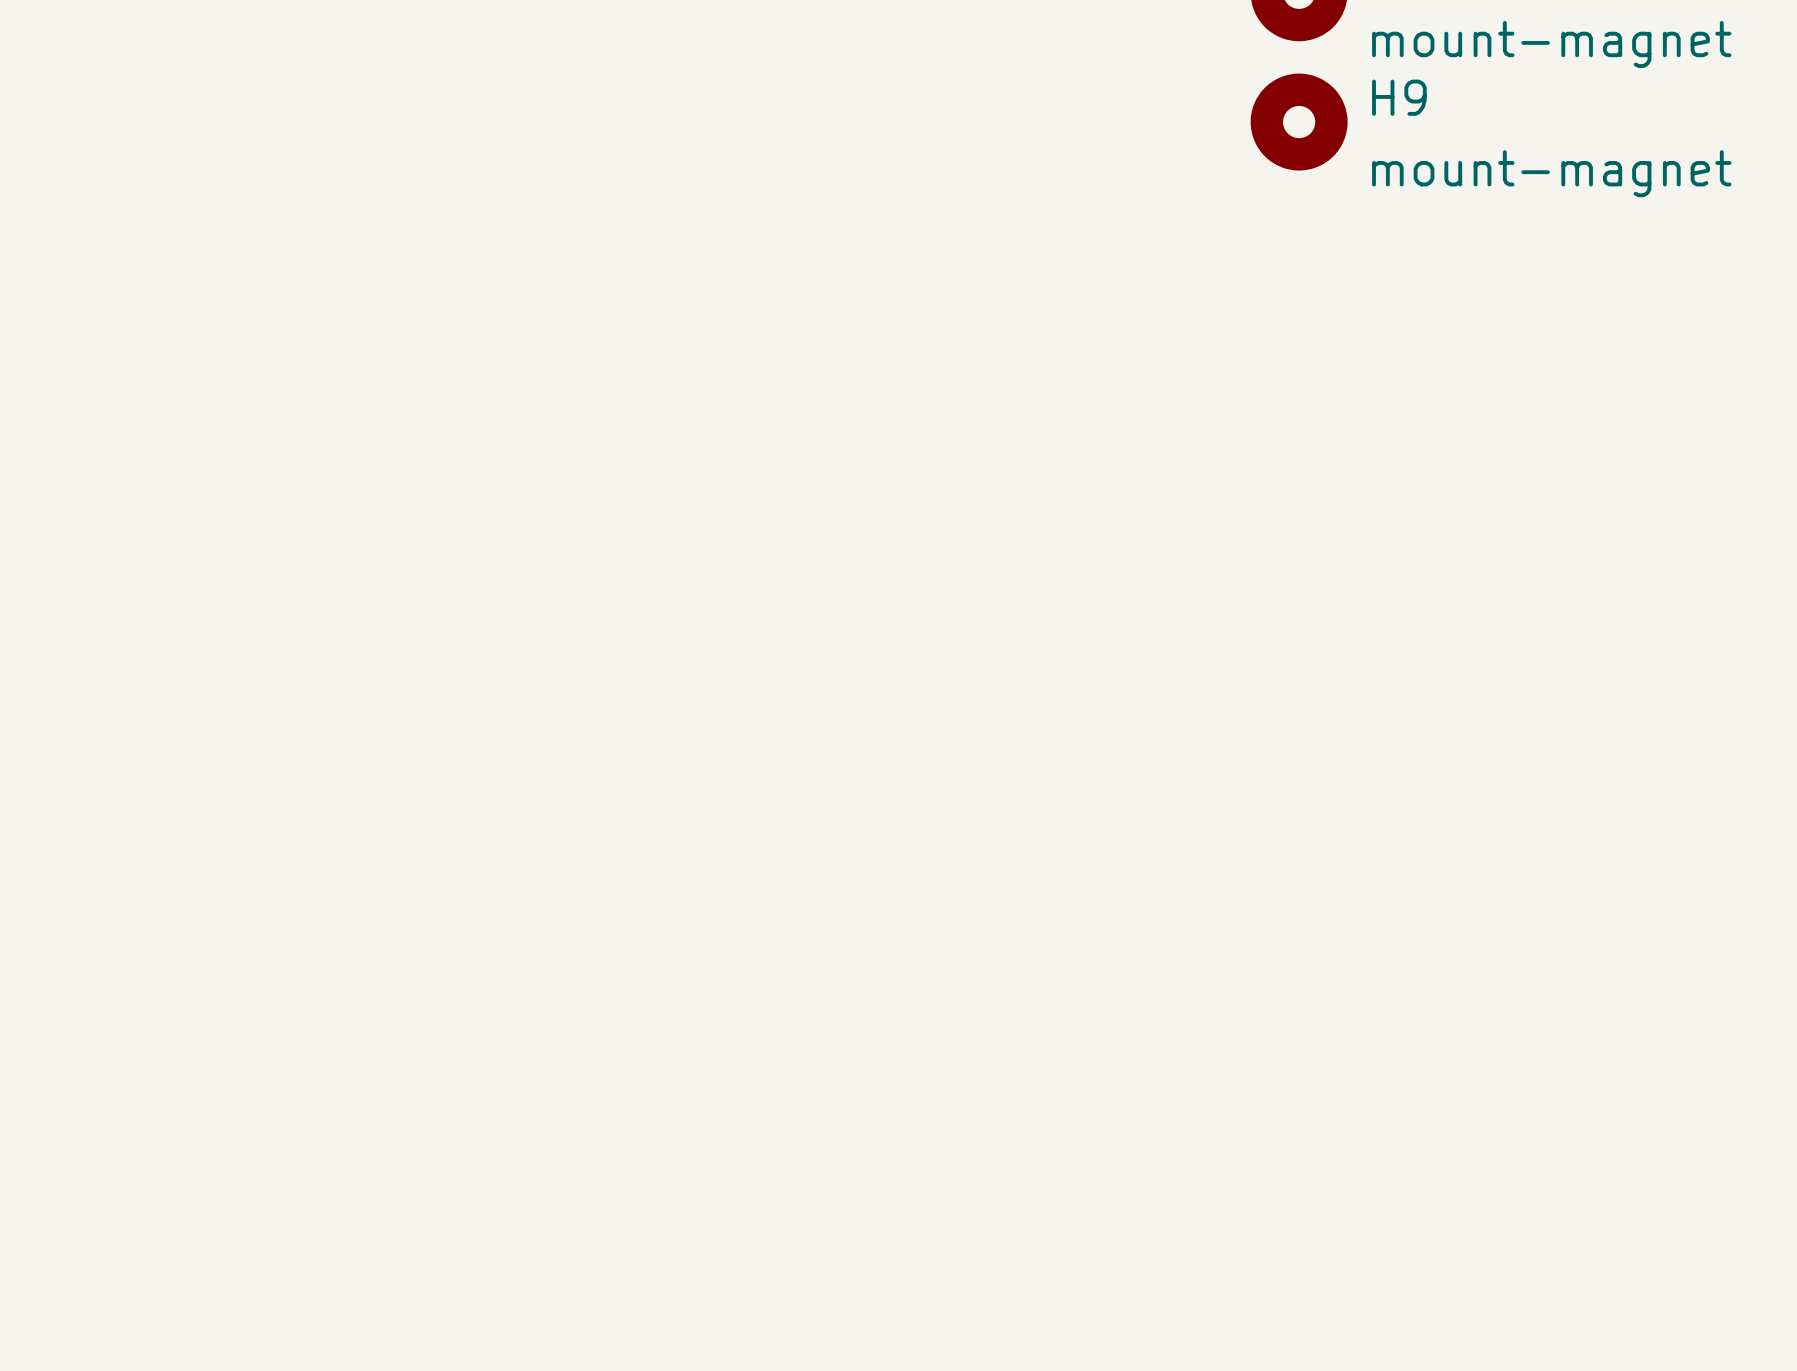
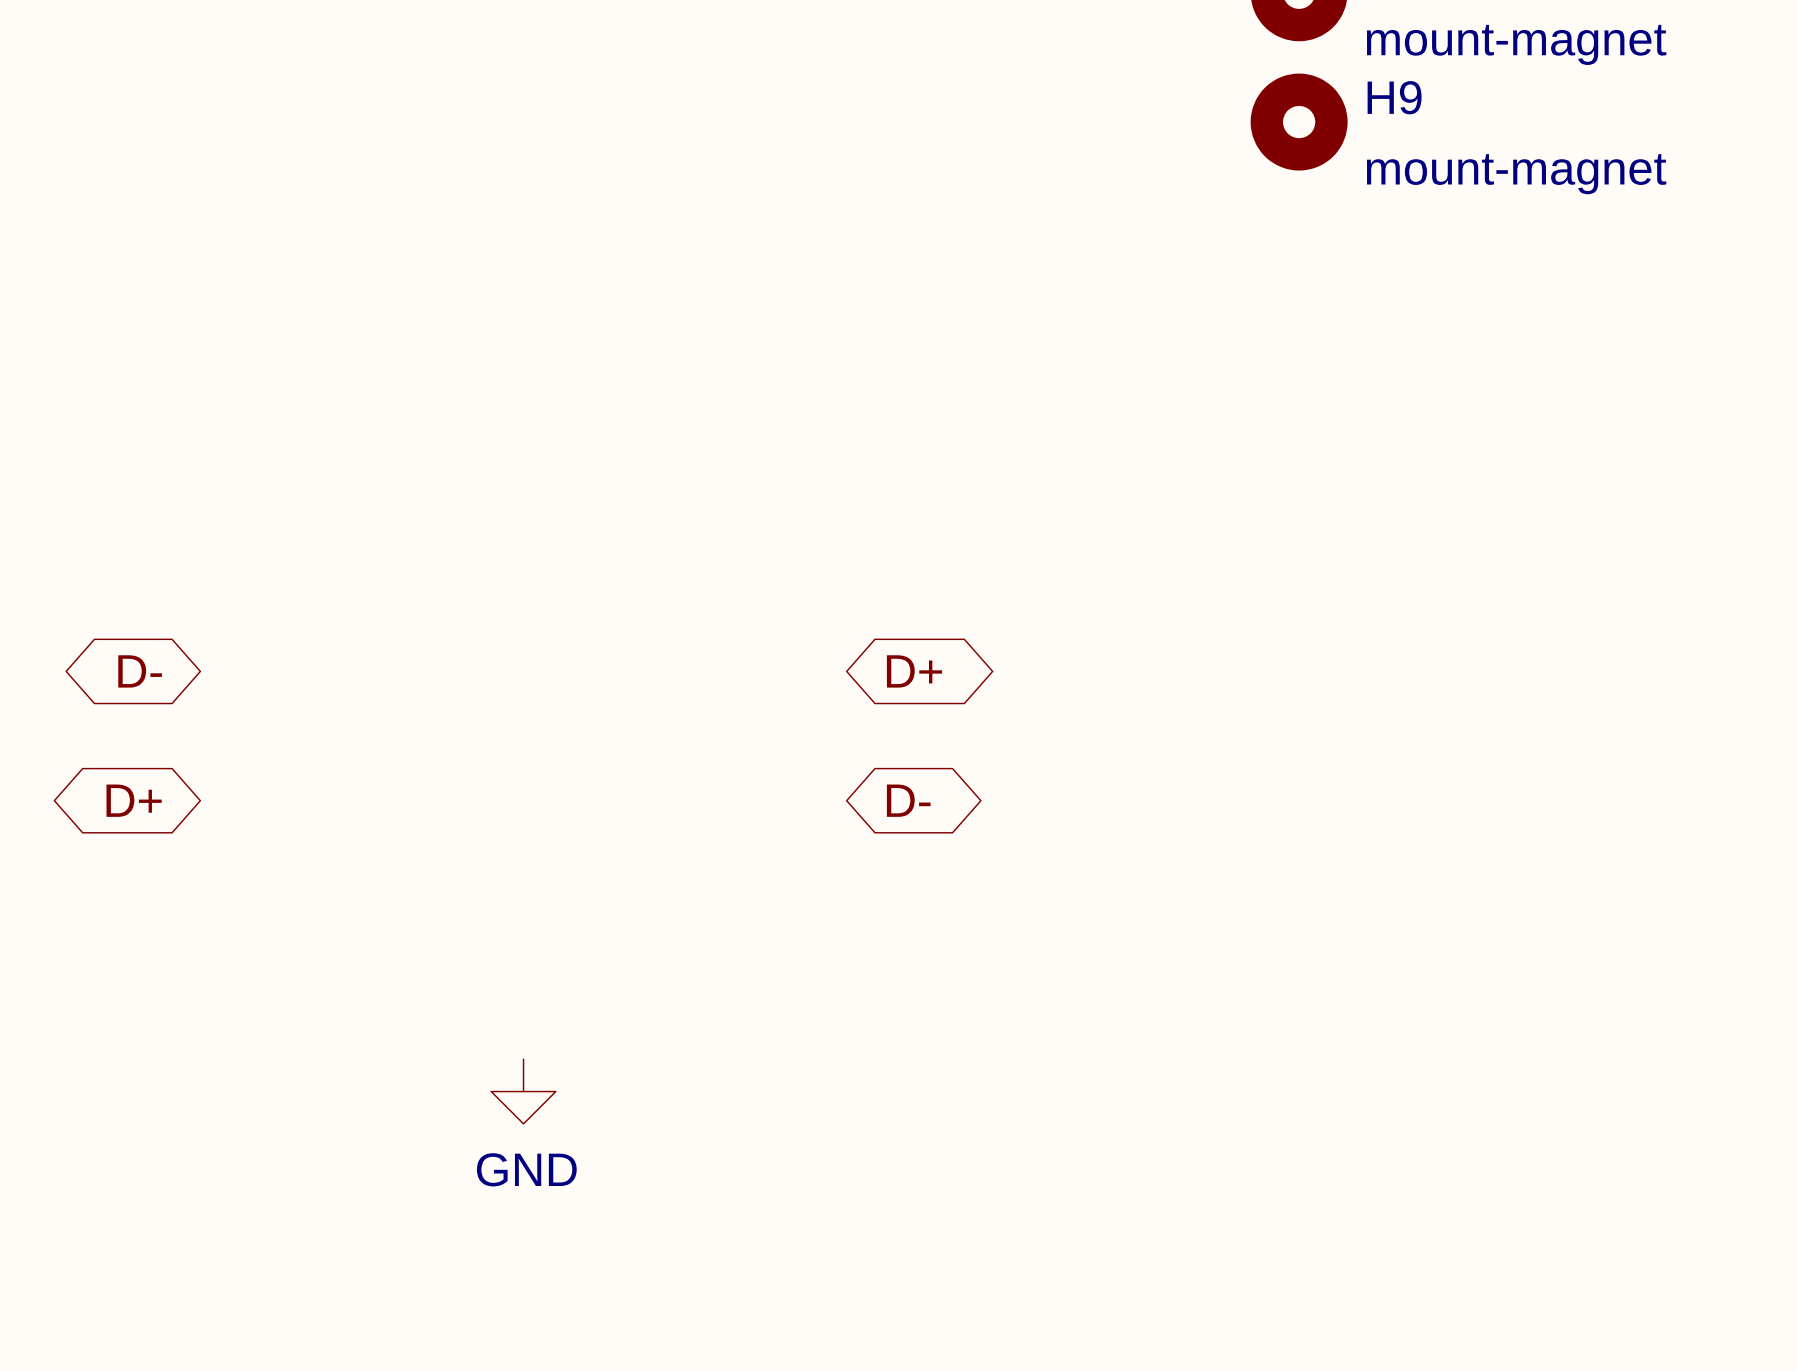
global label: none -> D- (140, 671)
global label: none -> D+ (914, 671)
global label: none -> D+ (134, 800)
global label: none -> D- (908, 800)
power symbol: none -> GND (523, 1091)

